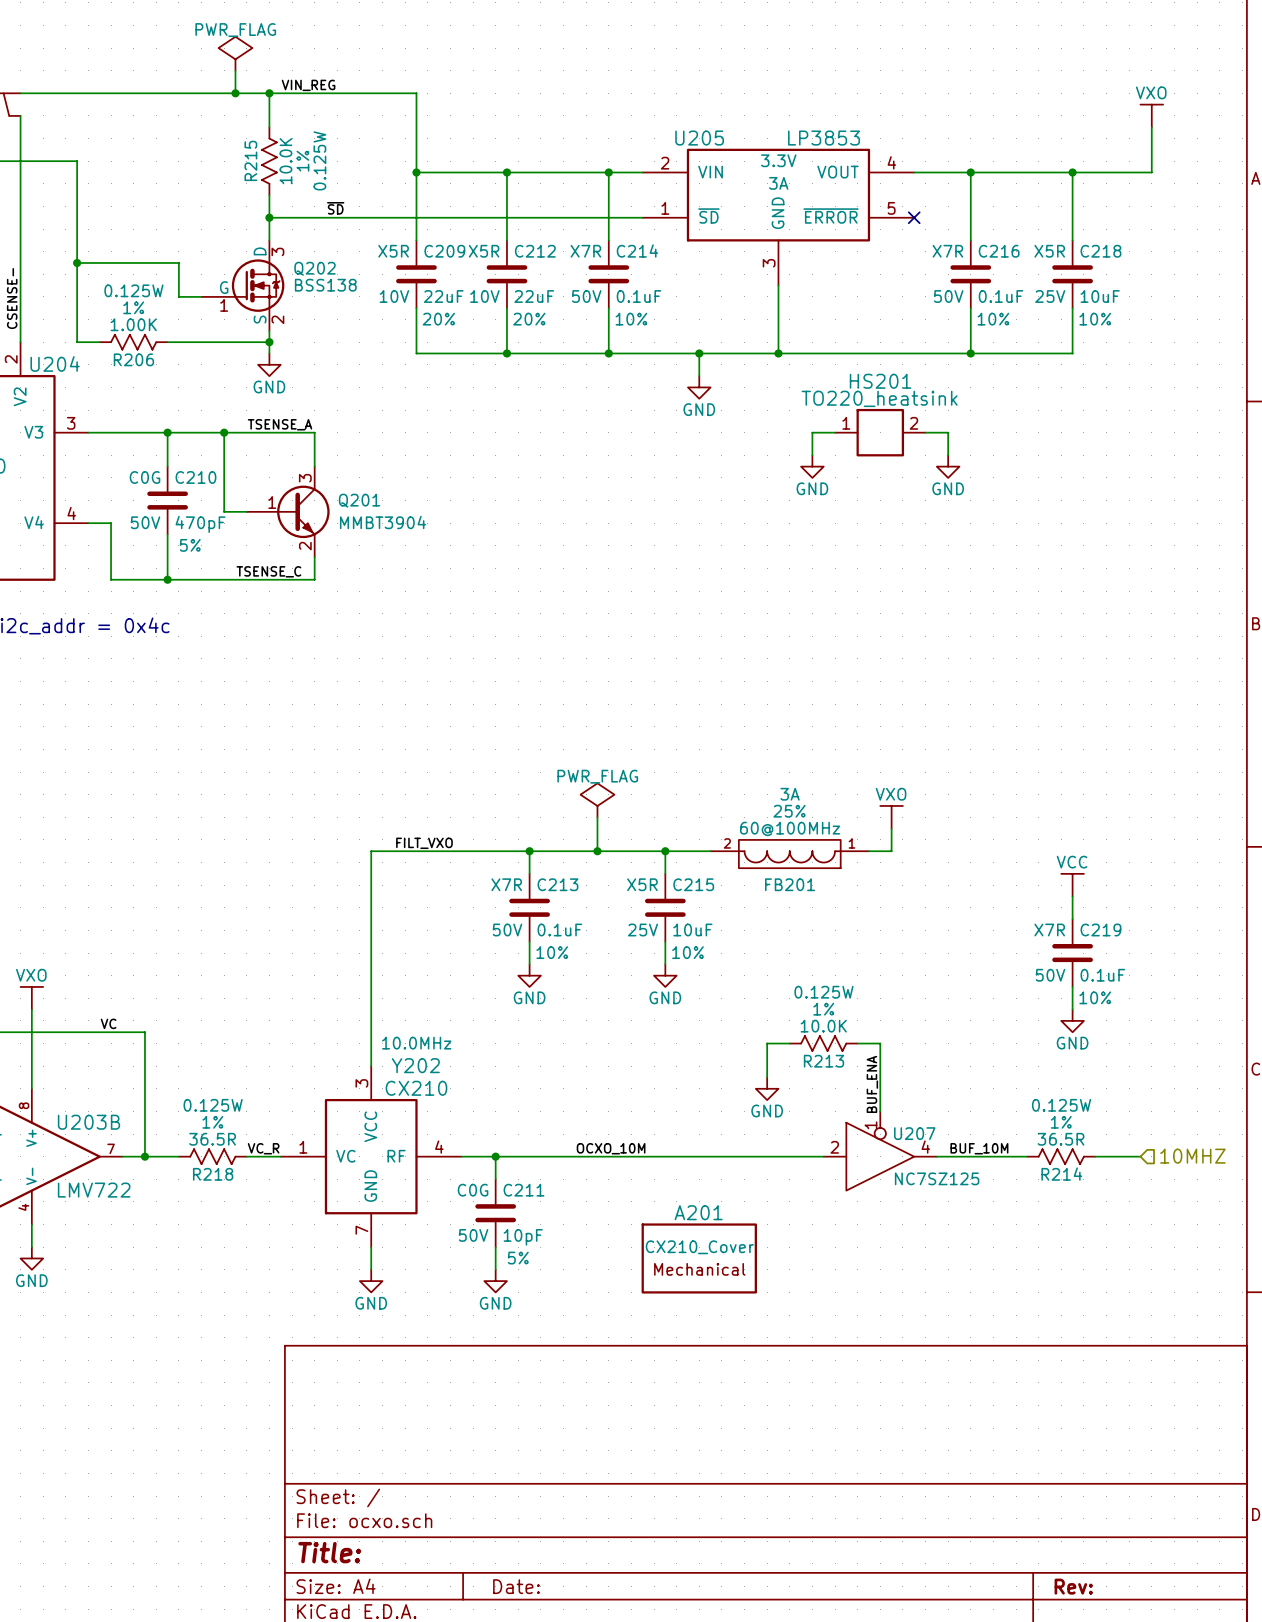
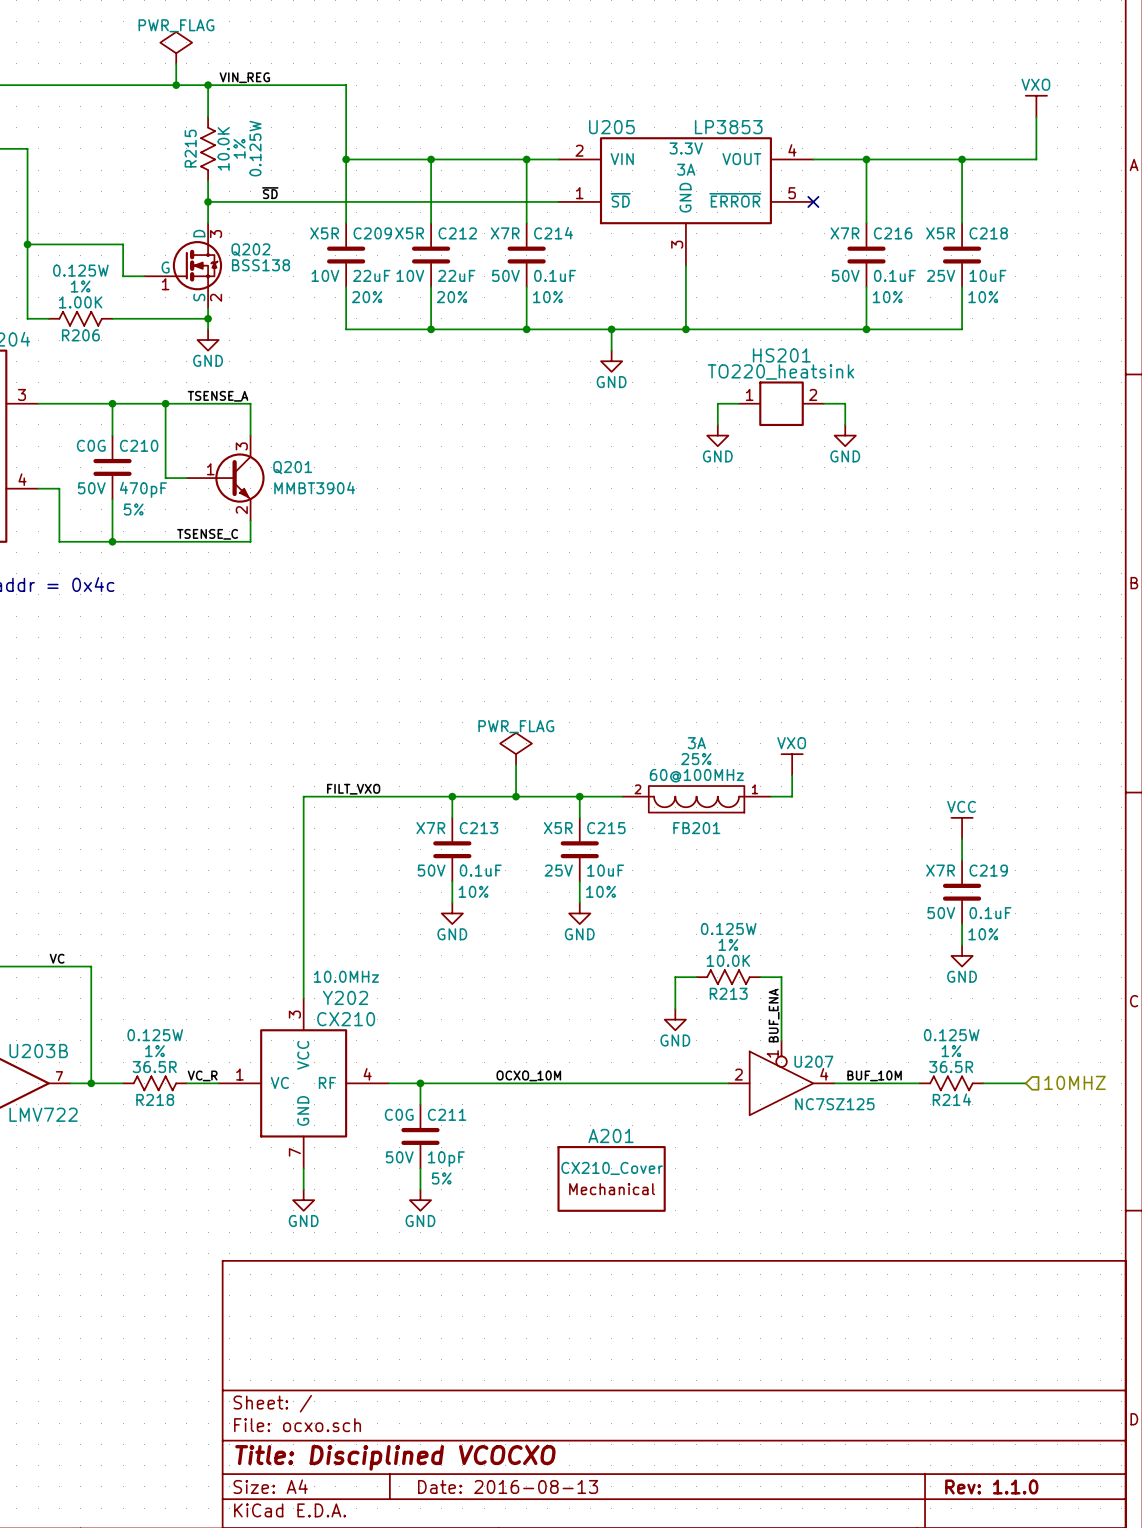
title block: Title: (329, 1552) -> Title: Disciplined VCOCXO (395, 1457)
title block: Date: (516, 1586) -> Date: 2016-08-13 (508, 1486)
title block: Rev: (1073, 1586) -> Rev: 1.1.0 (991, 1486)

